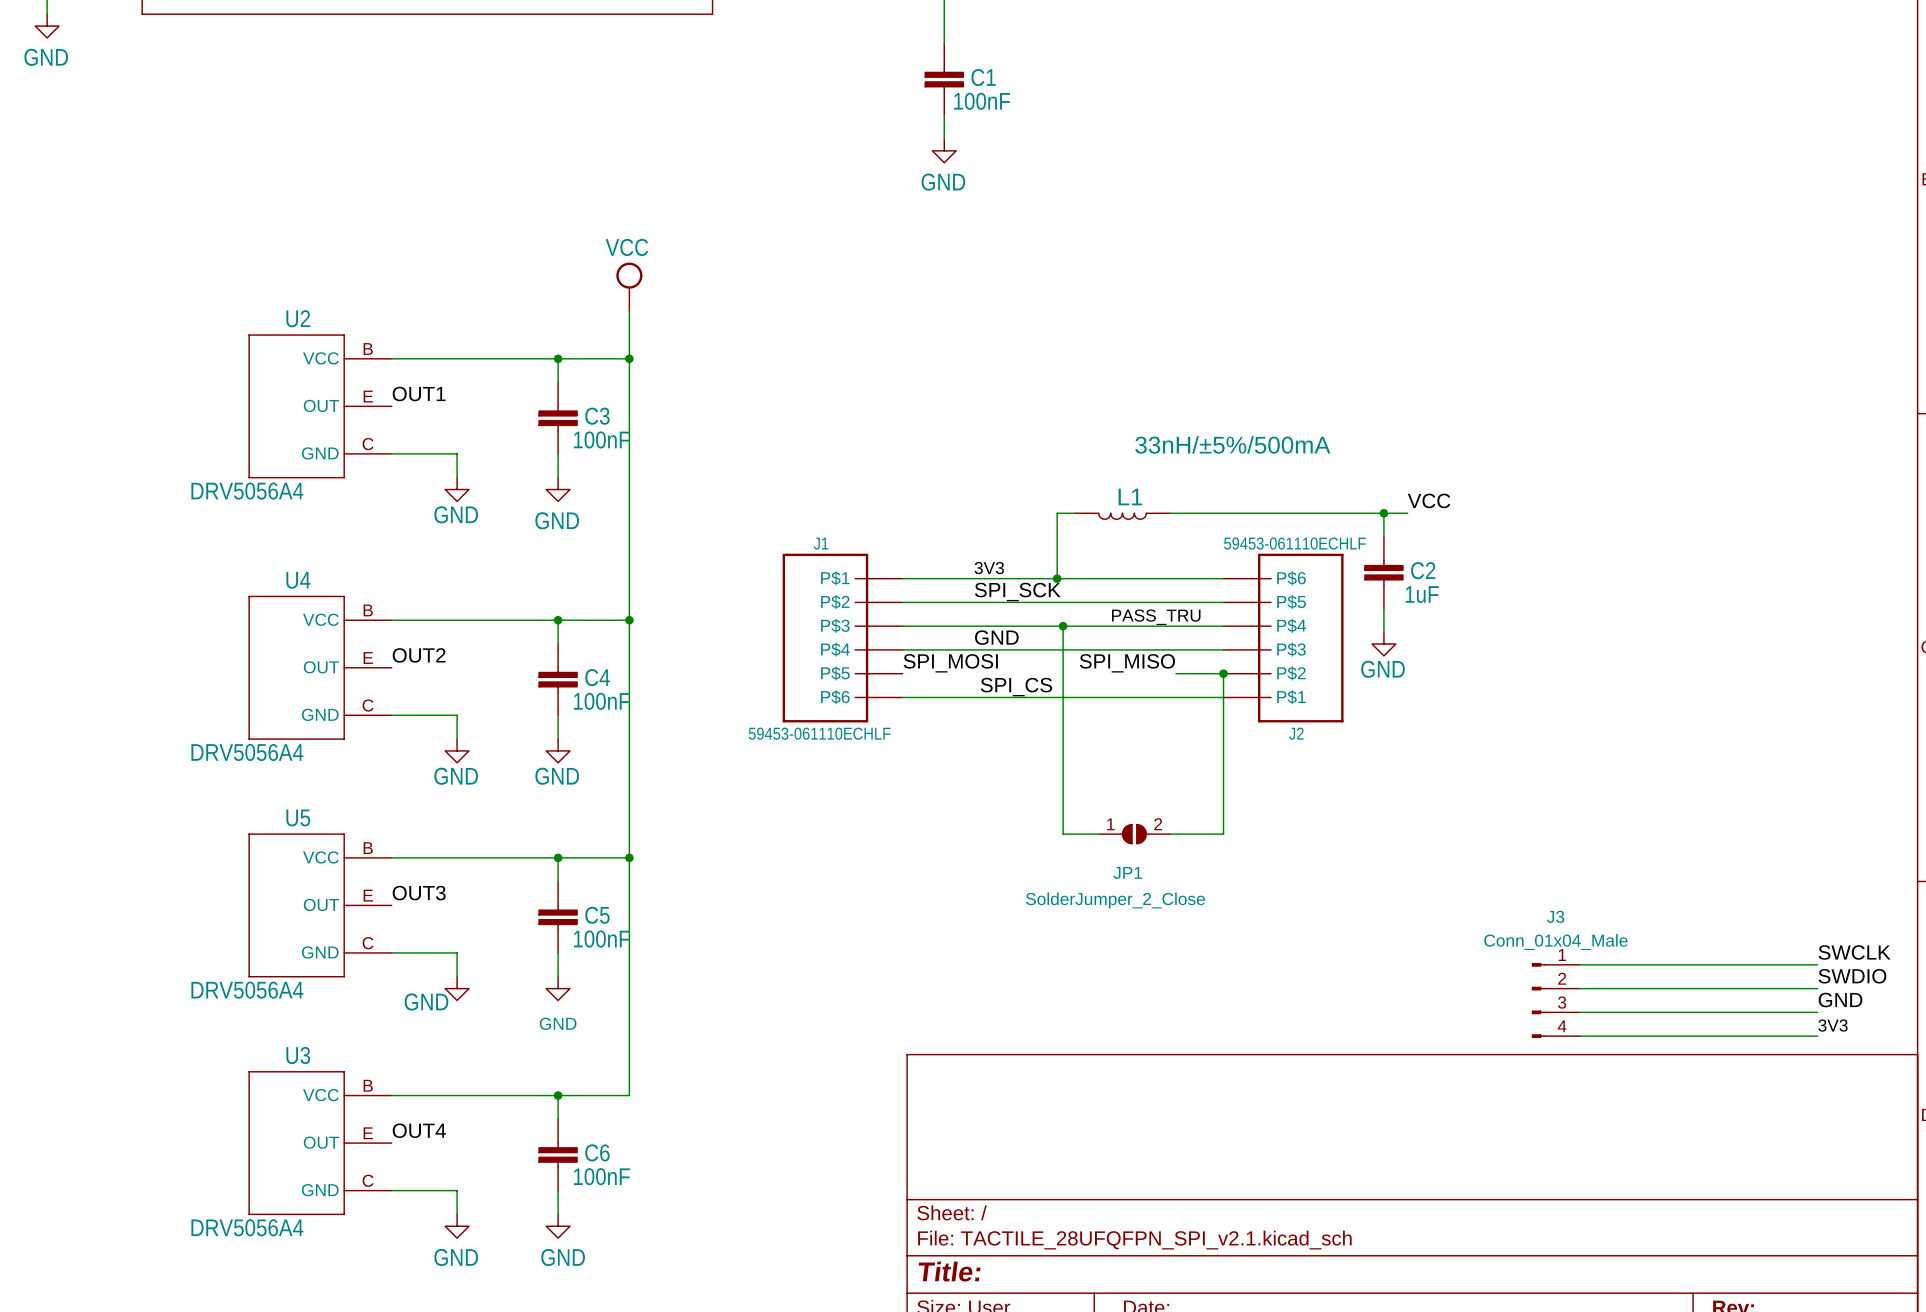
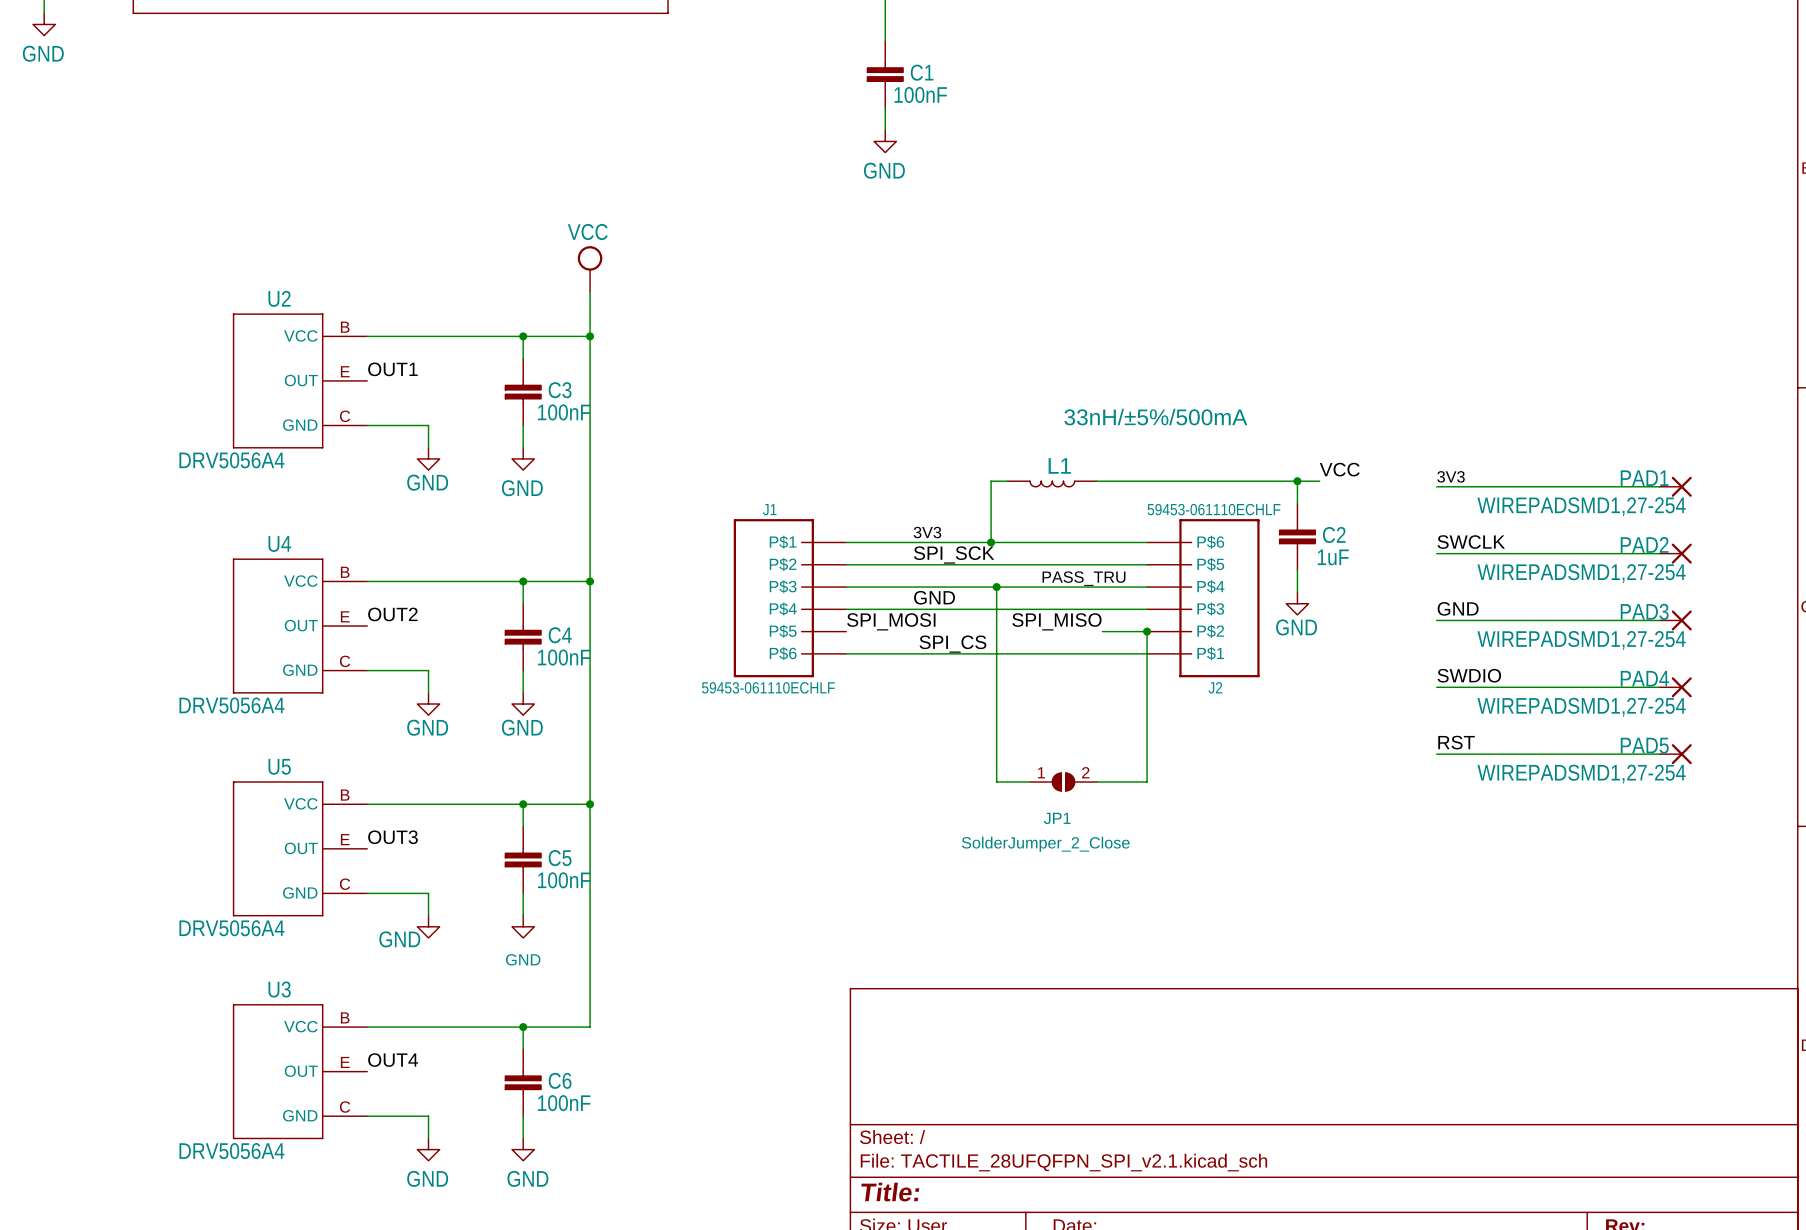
label: none -> 3V3 (1451, 476)
wire: none -> (1436, 486) (1659, 486)
PAD1: none -> WIREPADSMD1,27-254 (1675, 486)
label: none -> SWCLK (1471, 542)
wire: none -> (1436, 553) (1659, 553)
PAD2: none -> WIREPADSMD1,27-254 (1675, 553)
label: none -> GND (1458, 608)
wire: none -> (1436, 620) (1659, 620)
PAD3: none -> WIREPADSMD1,27-254 (1675, 620)
label: none -> SWDIO (1469, 675)
wire: none -> (1436, 687) (1659, 687)
PAD4: none -> WIREPADSMD1,27-254 (1675, 687)
label: none -> RST (1456, 742)
PAD5: none -> WIREPADSMD1,27-254 (1675, 754)
label: SWCLK (1854, 952) -> none
wire: (1580, 964) (1817, 964) -> (1436, 754) (1659, 754)
label: SWDIO (1852, 976) -> none
wire: (1580, 988) (1817, 988) -> none
J3: Conn_01x04_Male (1555, 1000) -> none
label: GND (1840, 1000) -> none
wire: (1580, 1012) (1817, 1012) -> none
label: 3V3 (1832, 1025) -> none
wire: (1580, 1036) (1817, 1036) -> none

